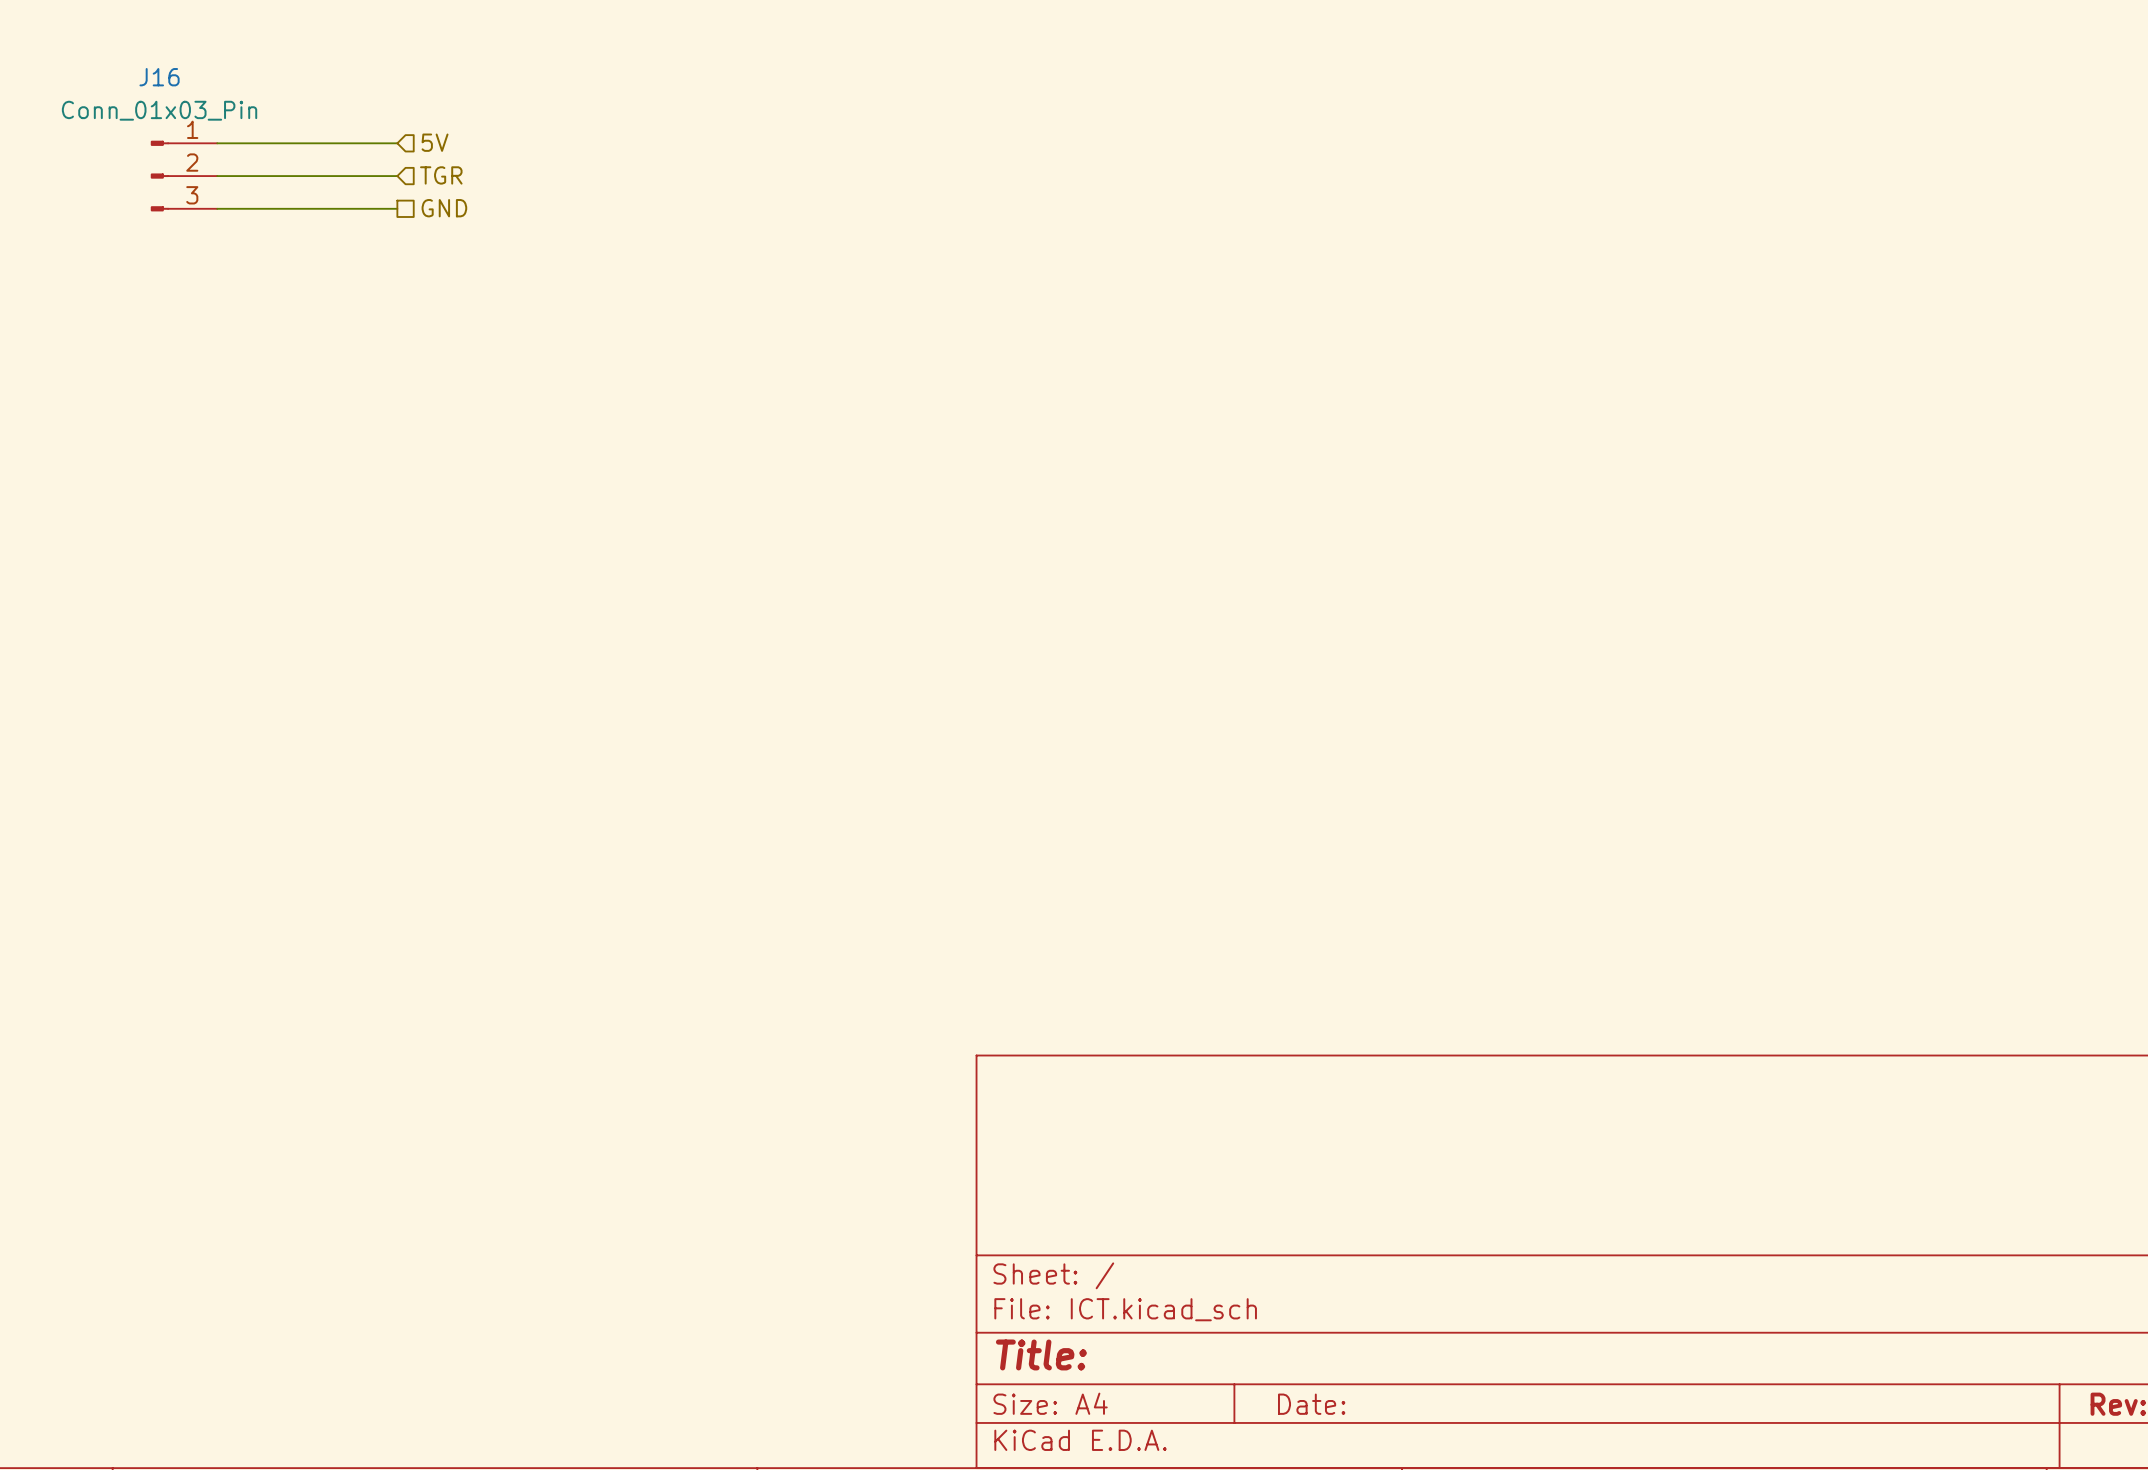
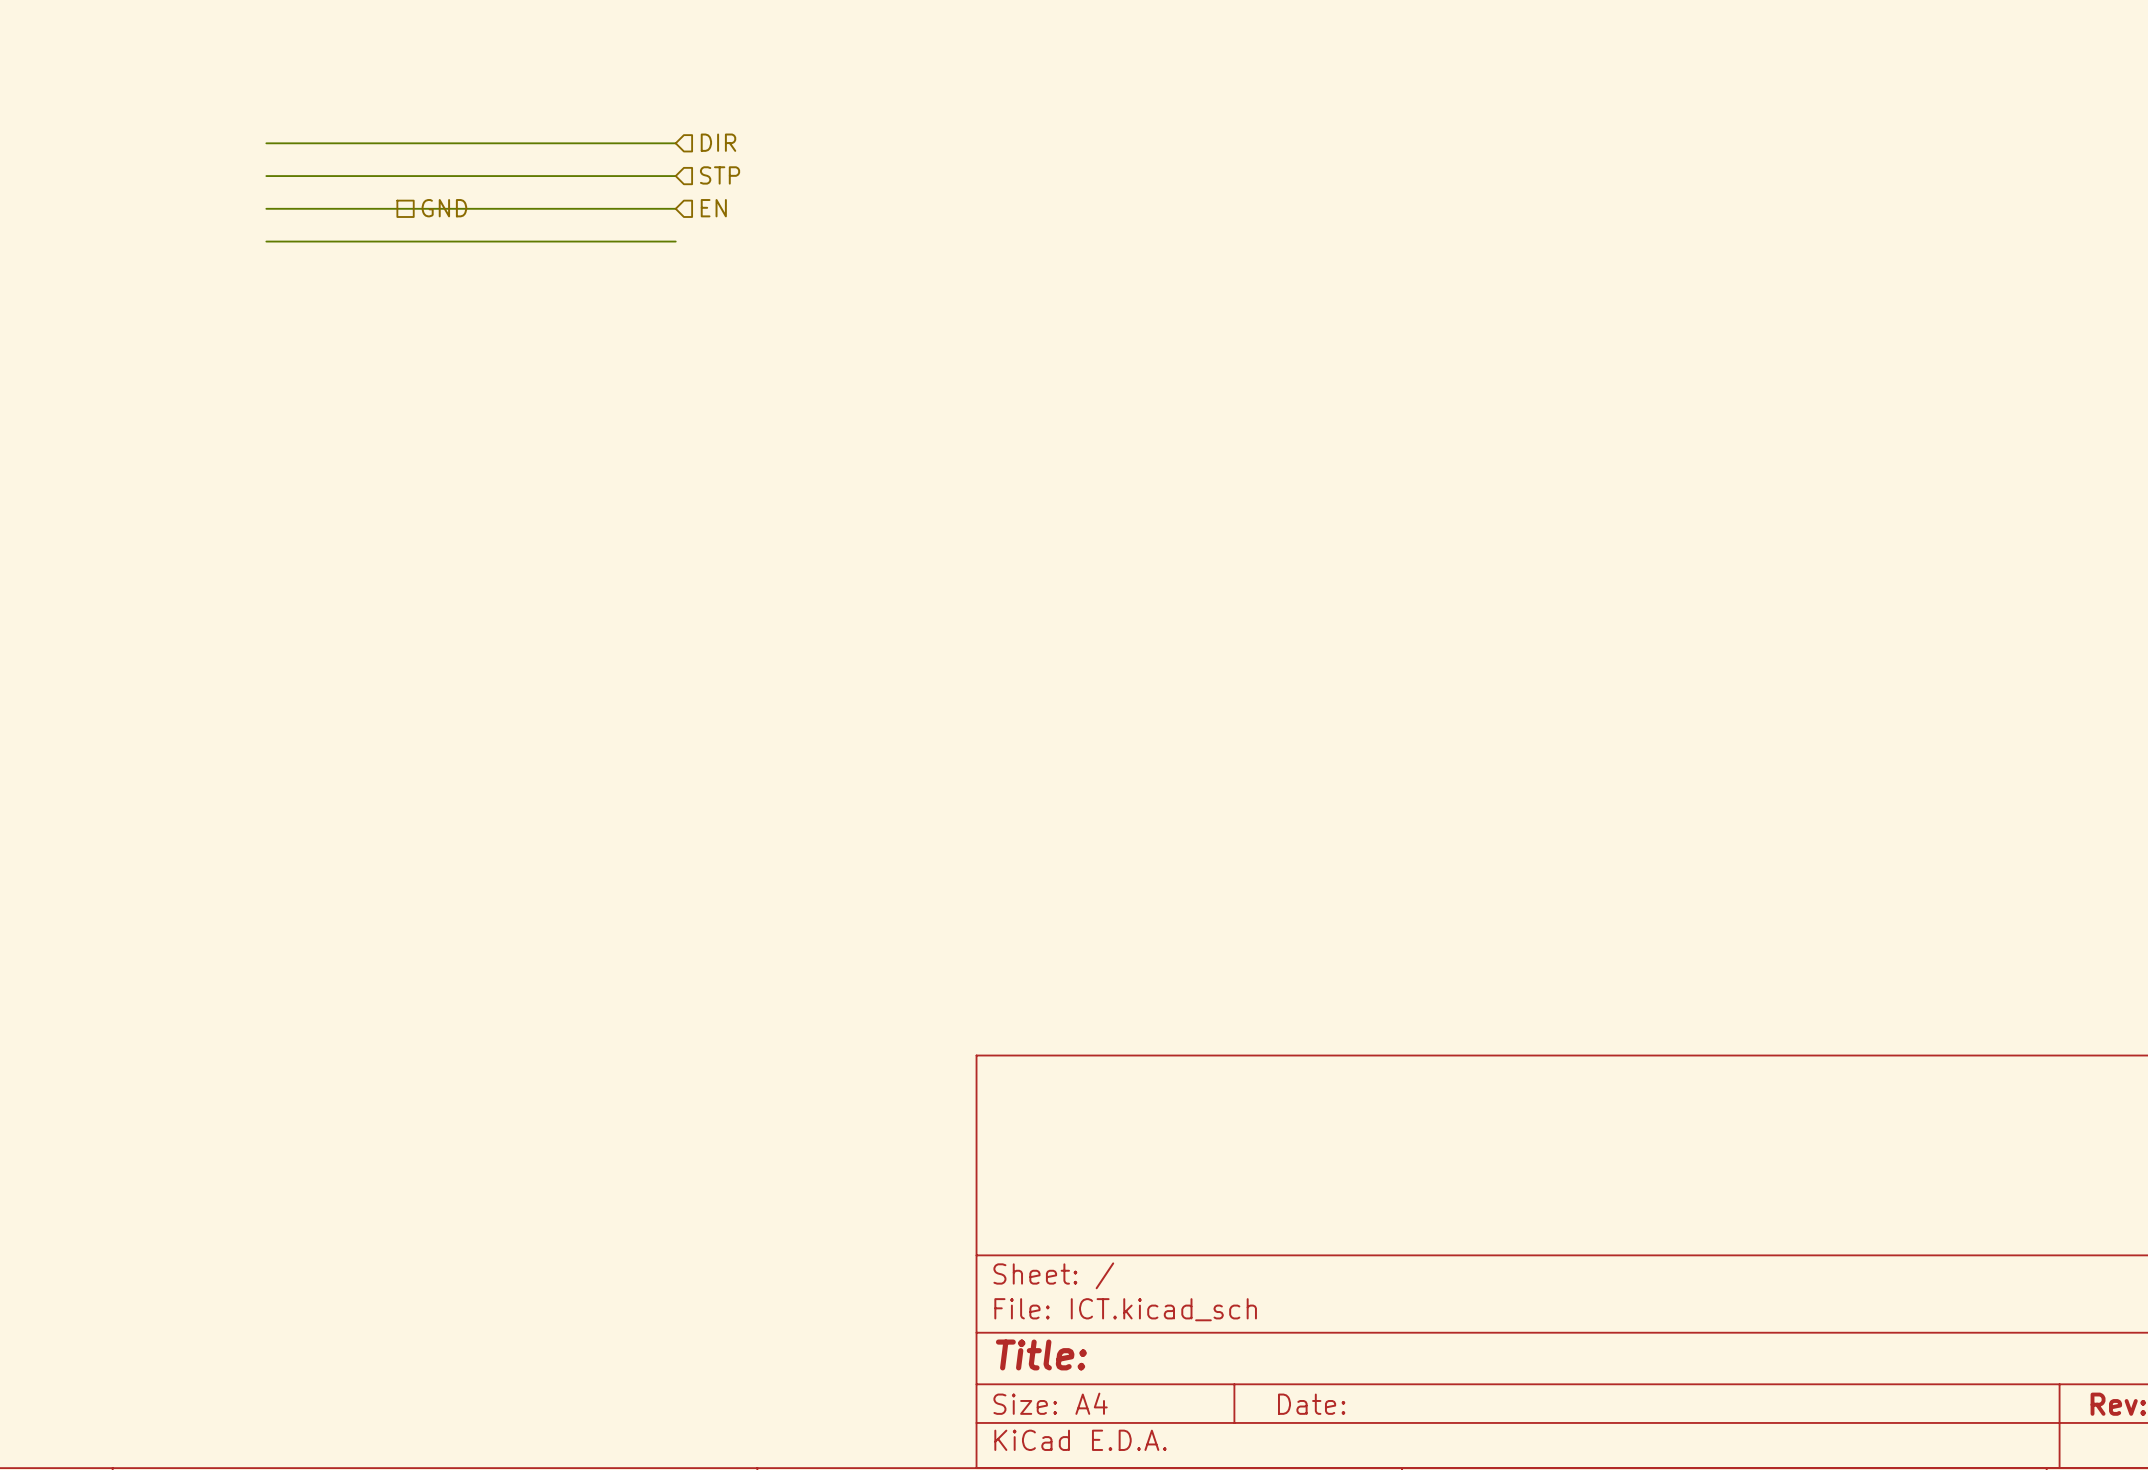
hierarchical label: 5V (435, 142) -> none
hierarchical label: none -> DIR (718, 142)
wire: (217, 143) (266, 143) -> none
wire: none -> (397, 143) (675, 143)
hierarchical label: TGR (441, 175) -> none
hierarchical label: none -> STP (720, 175)
J16: Conn_01x03_Pin (184, 176) -> none
wire: (217, 176) (266, 176) -> none
wire: none -> (397, 176) (675, 176)
wire: (217, 208) (266, 208) -> none
wire: none -> (397, 208) (675, 208)
hierarchical label: none -> EN (713, 208)
wire: none -> (266, 241) (675, 241)

